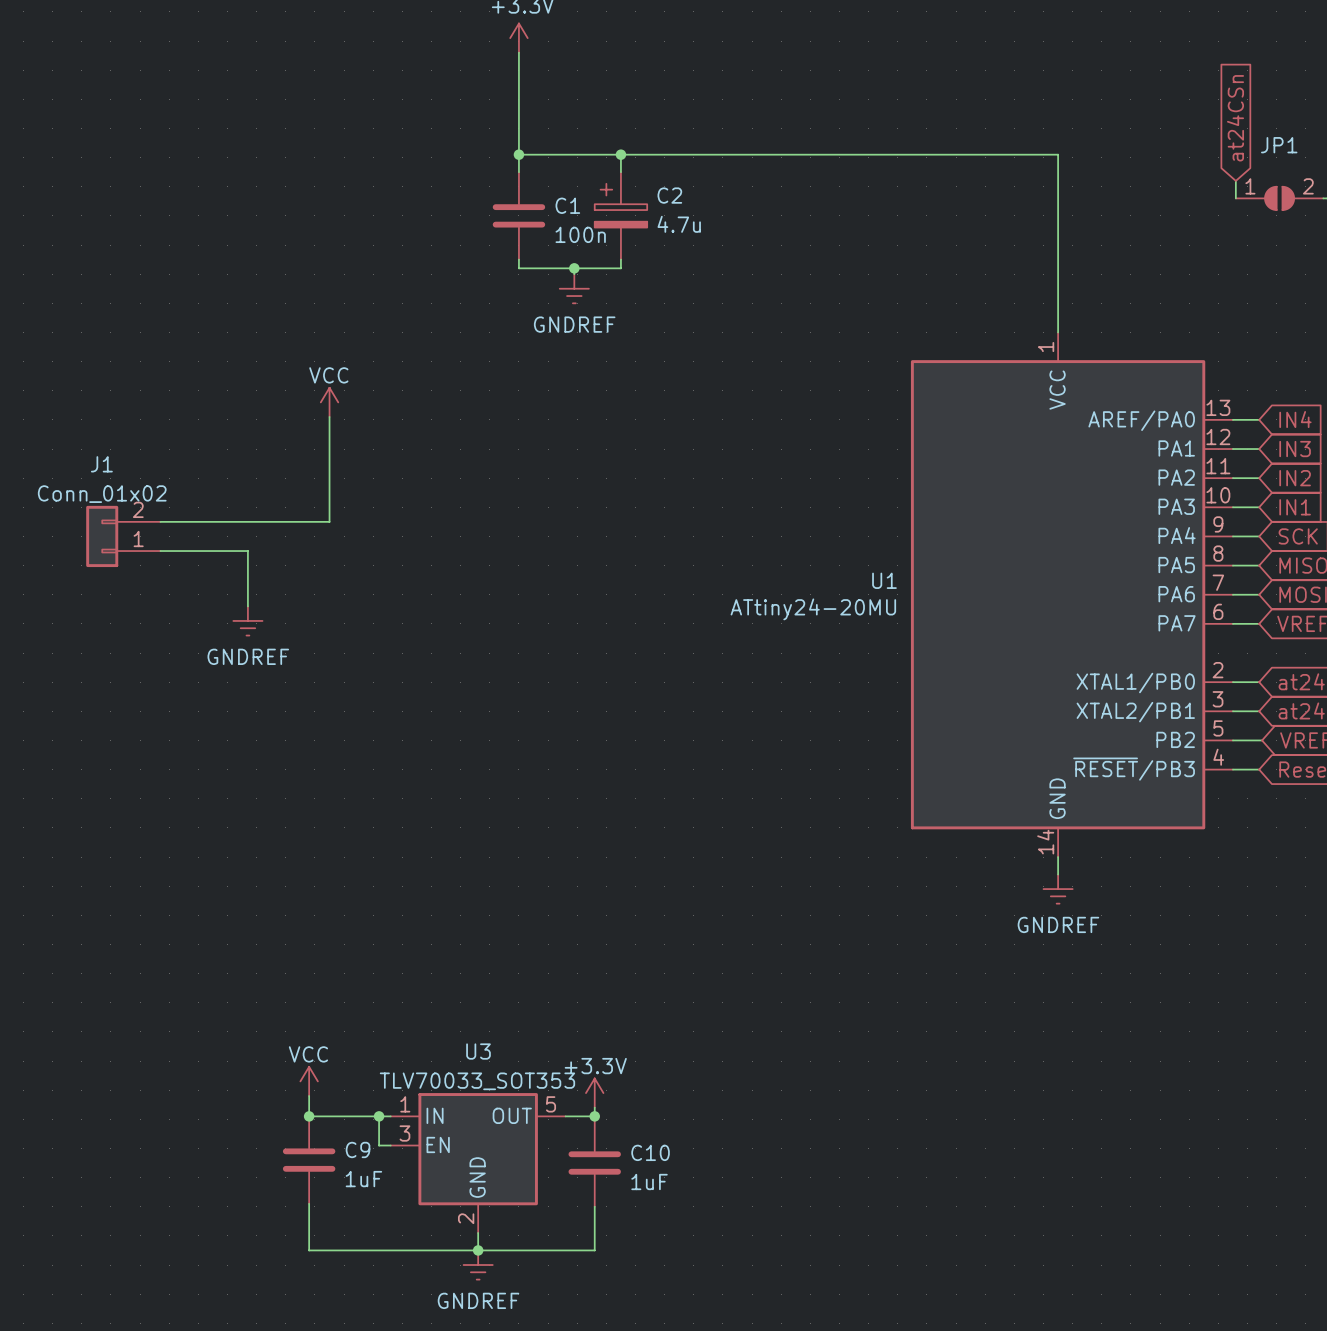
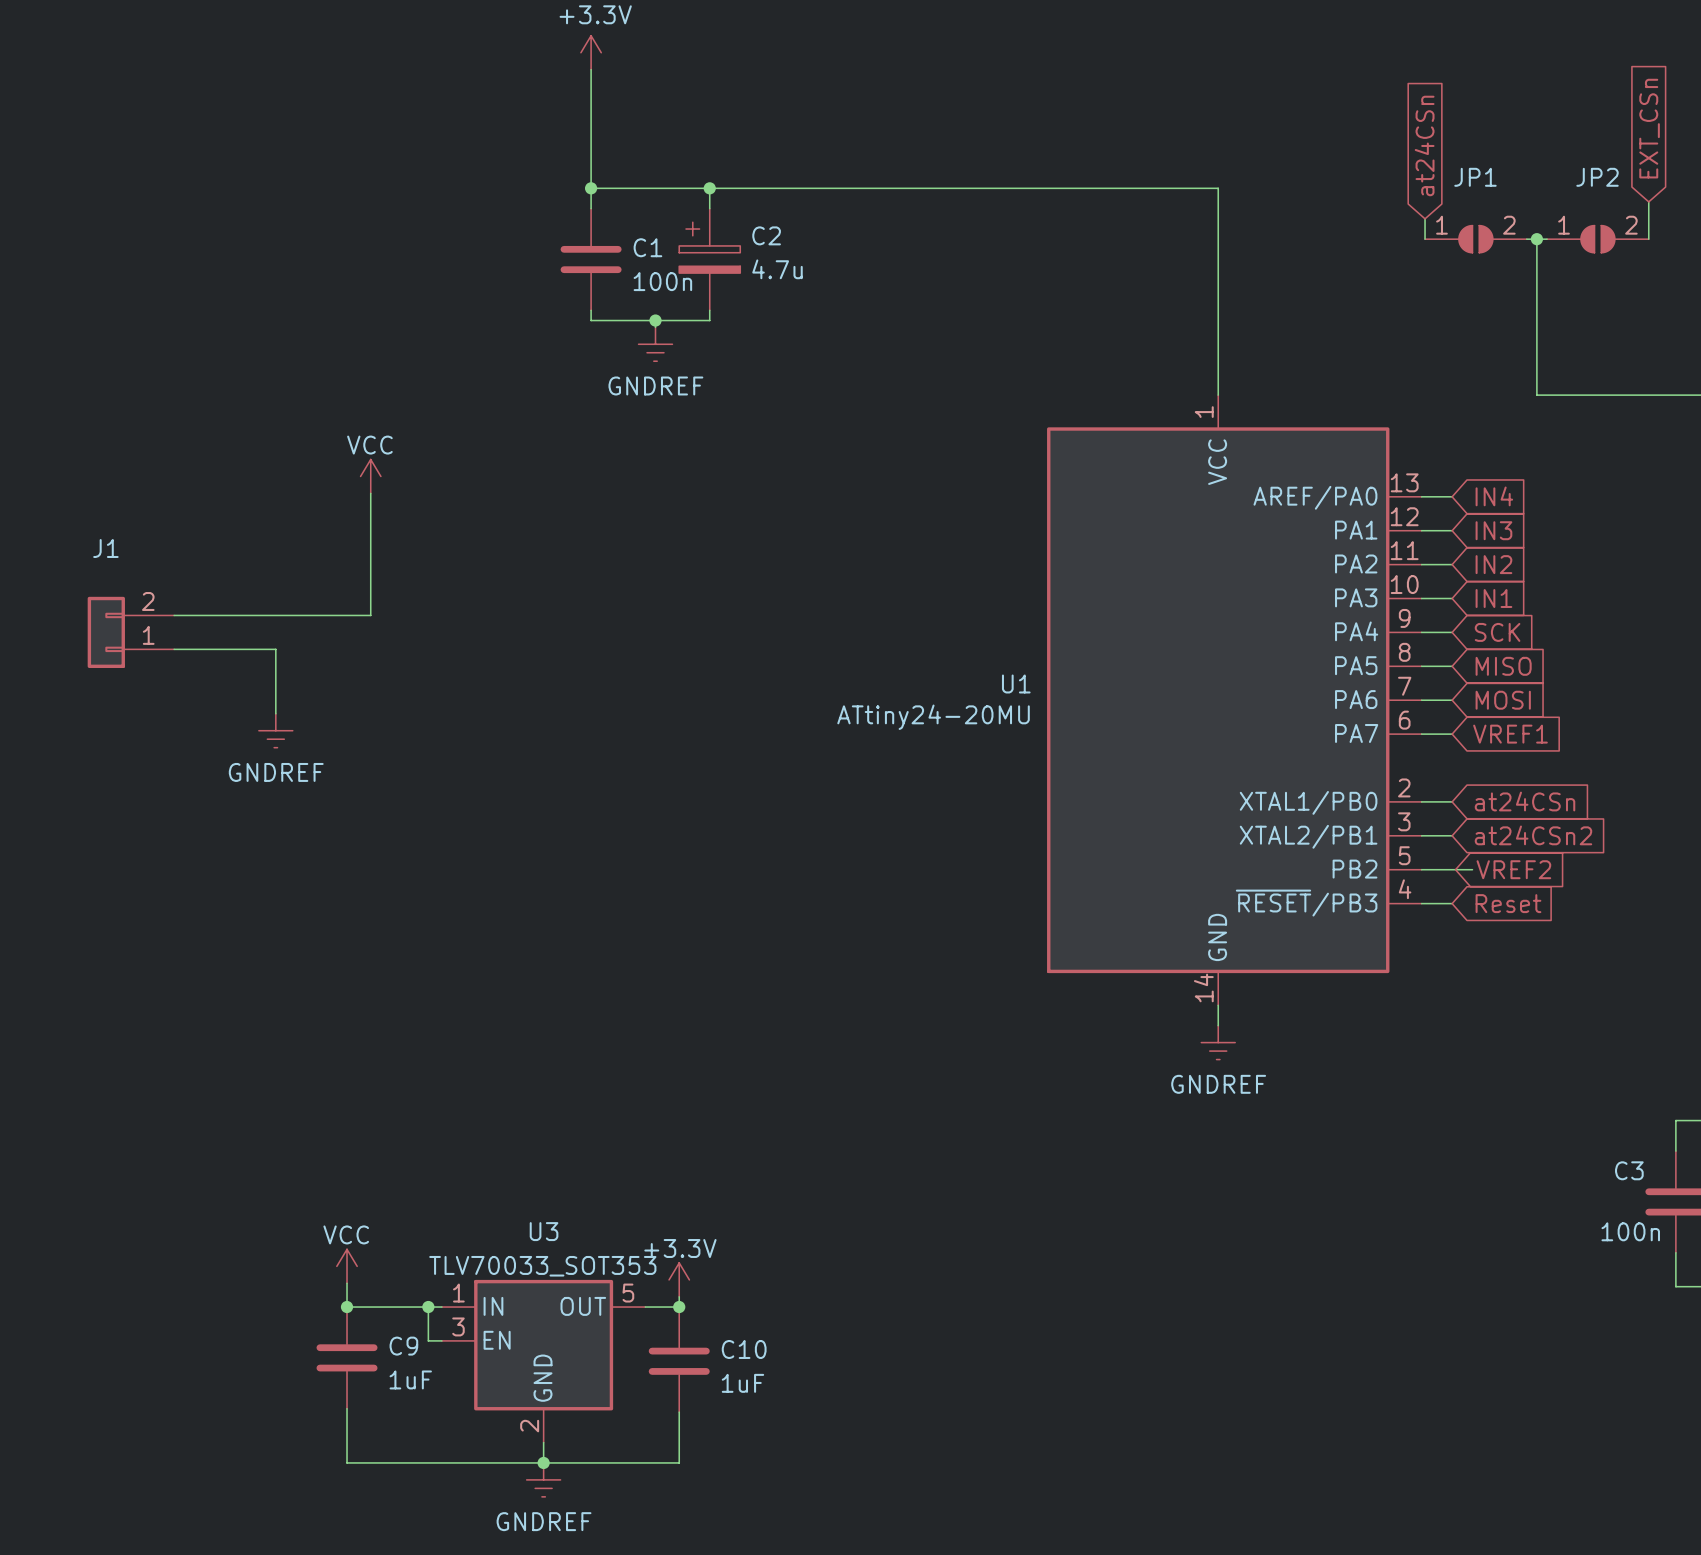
J1 value: Conn_01x02 (102, 494) -> none
wire: none -> (1455, 869) (1472, 869)

